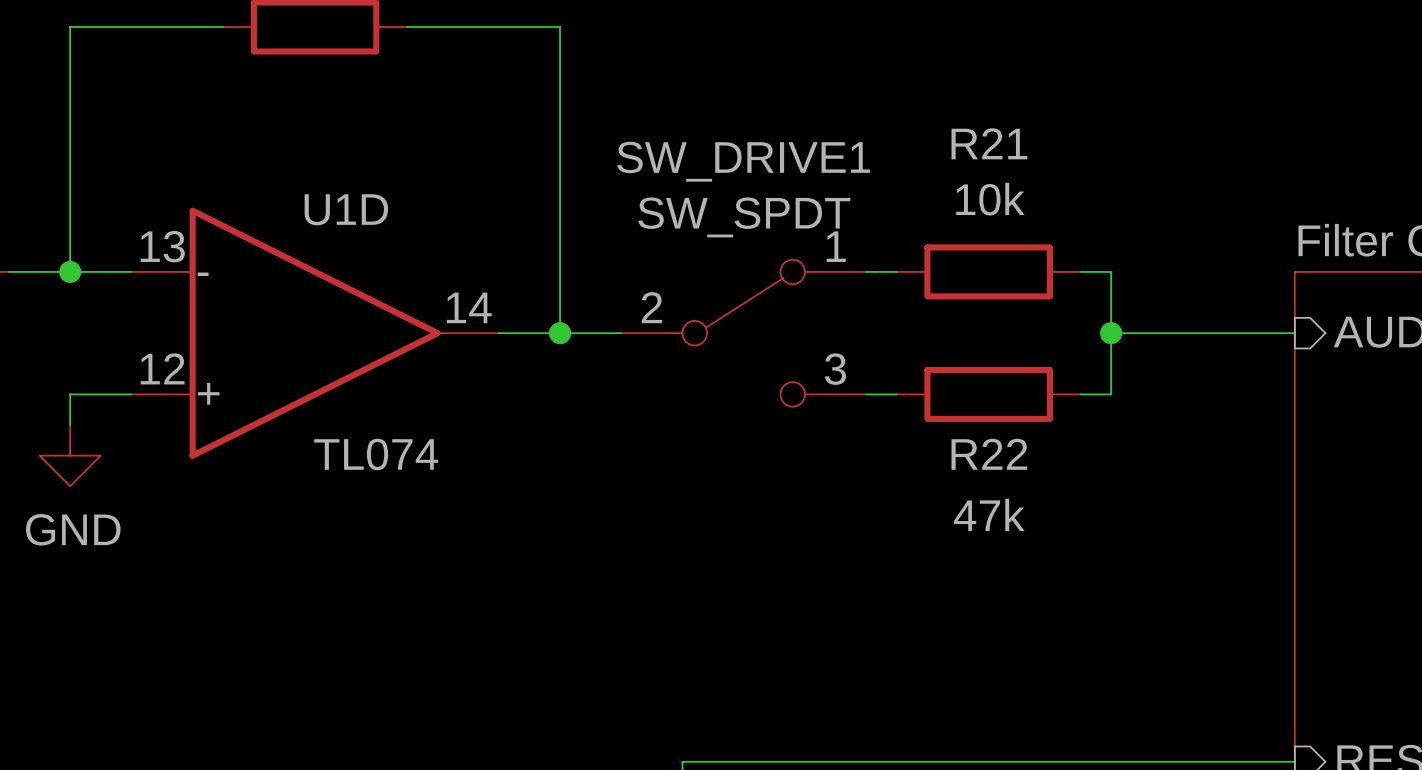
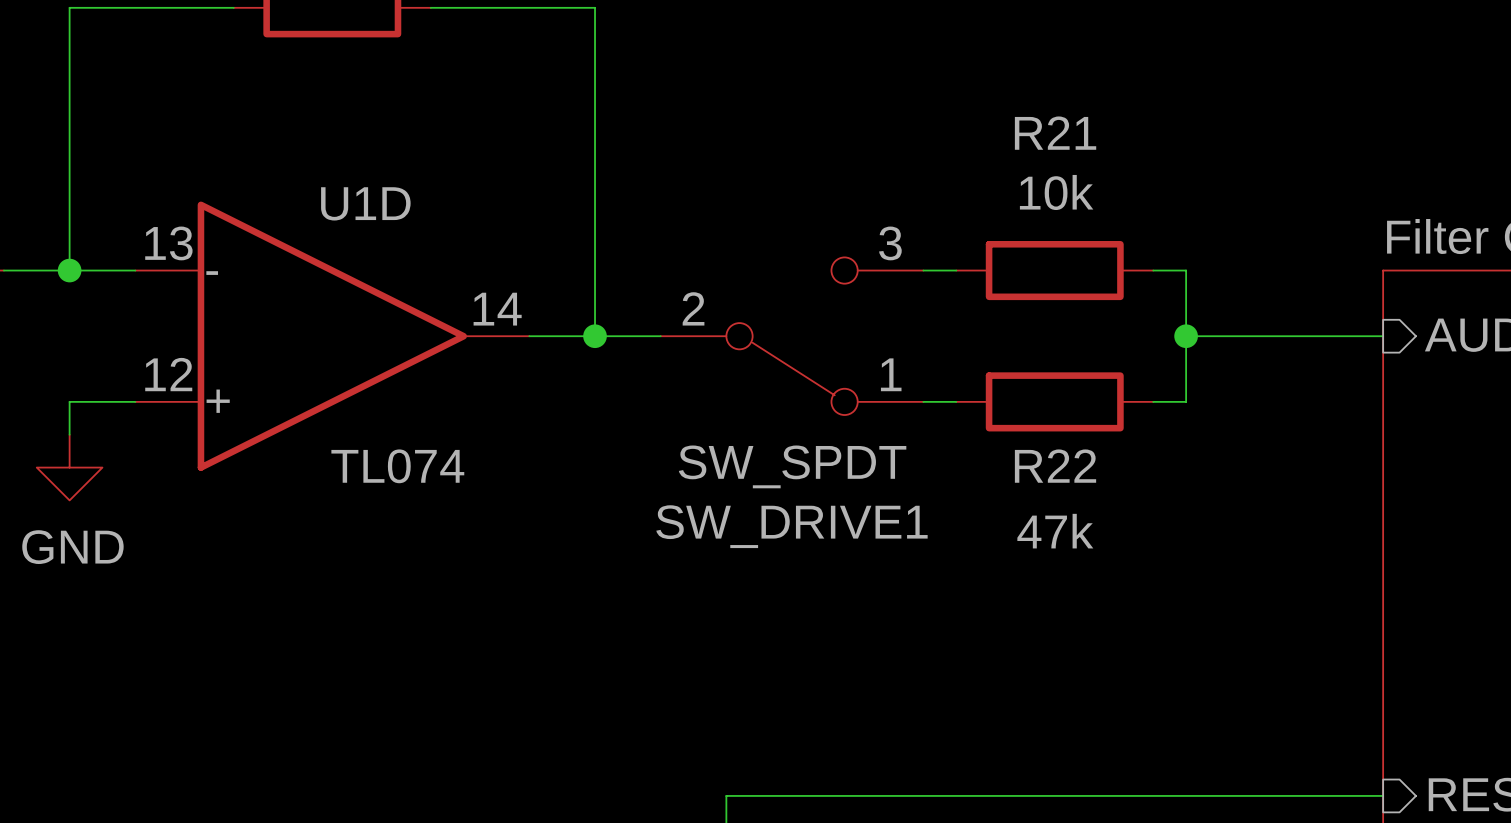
SW_DRIVE1 flip: as is (743, 333) -> up-down (792, 336)

